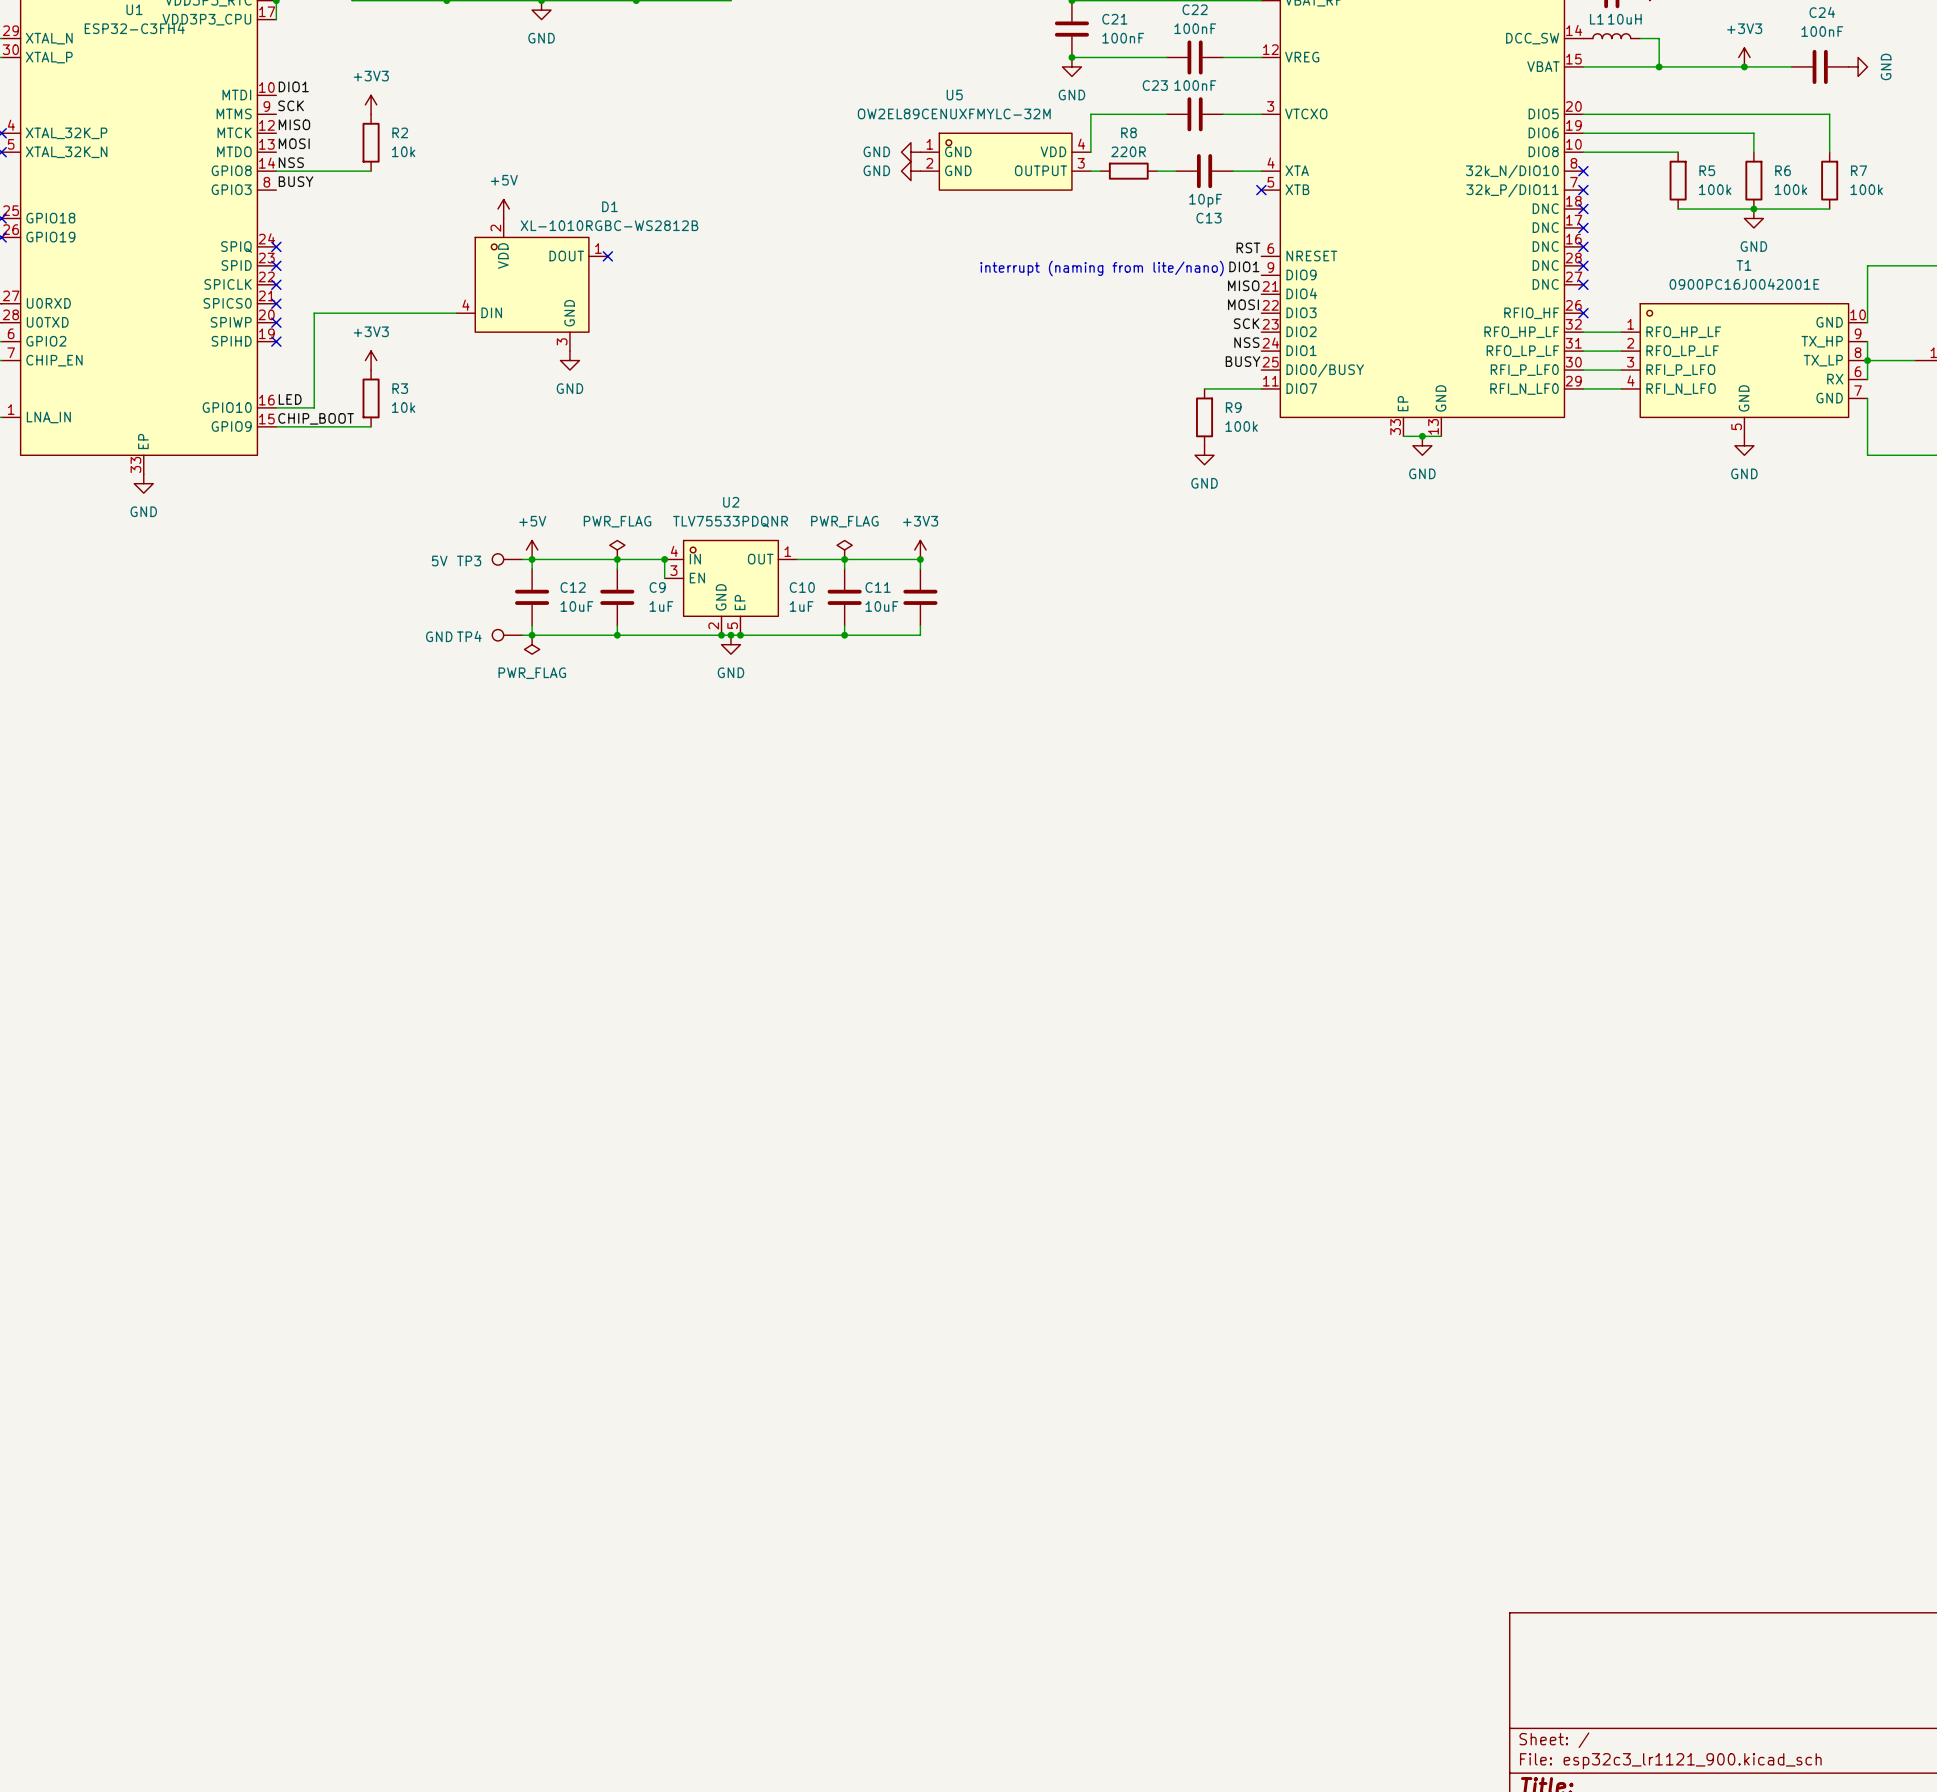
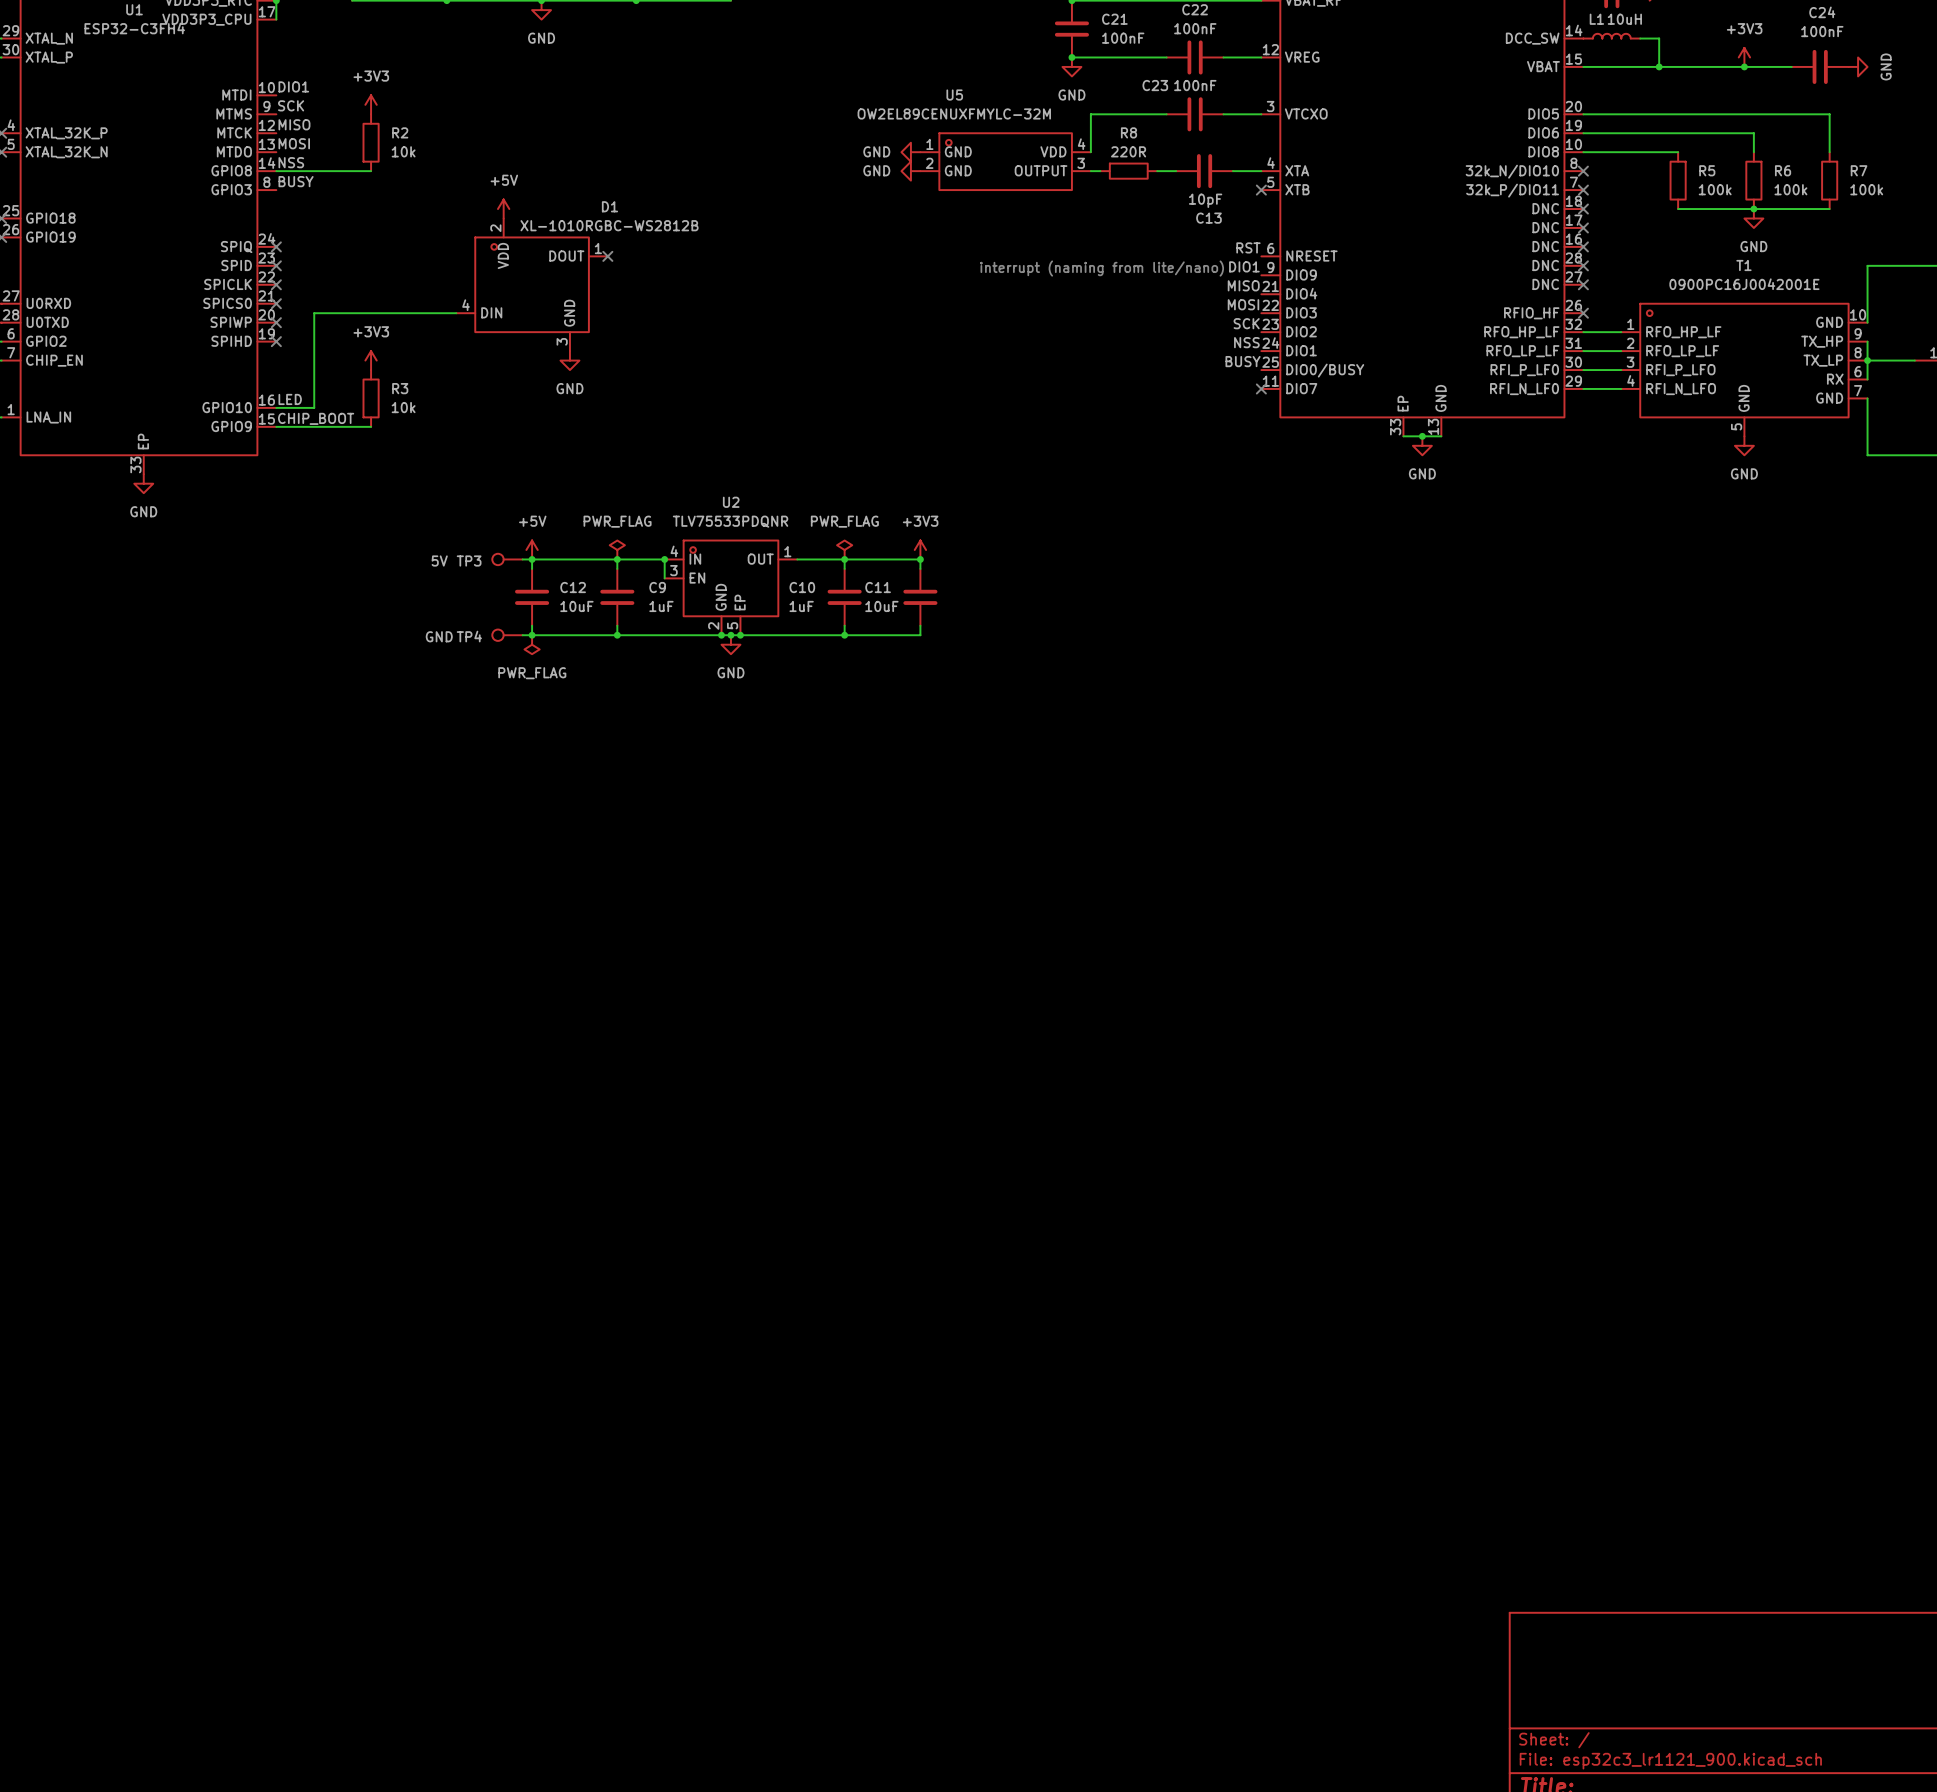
wire: (1204, 388) (1261, 388) -> none
no-connect mark: none -> (1261, 388)
R9: 100k (1204, 417) -> none
power symbol: GND (1204, 455) -> none

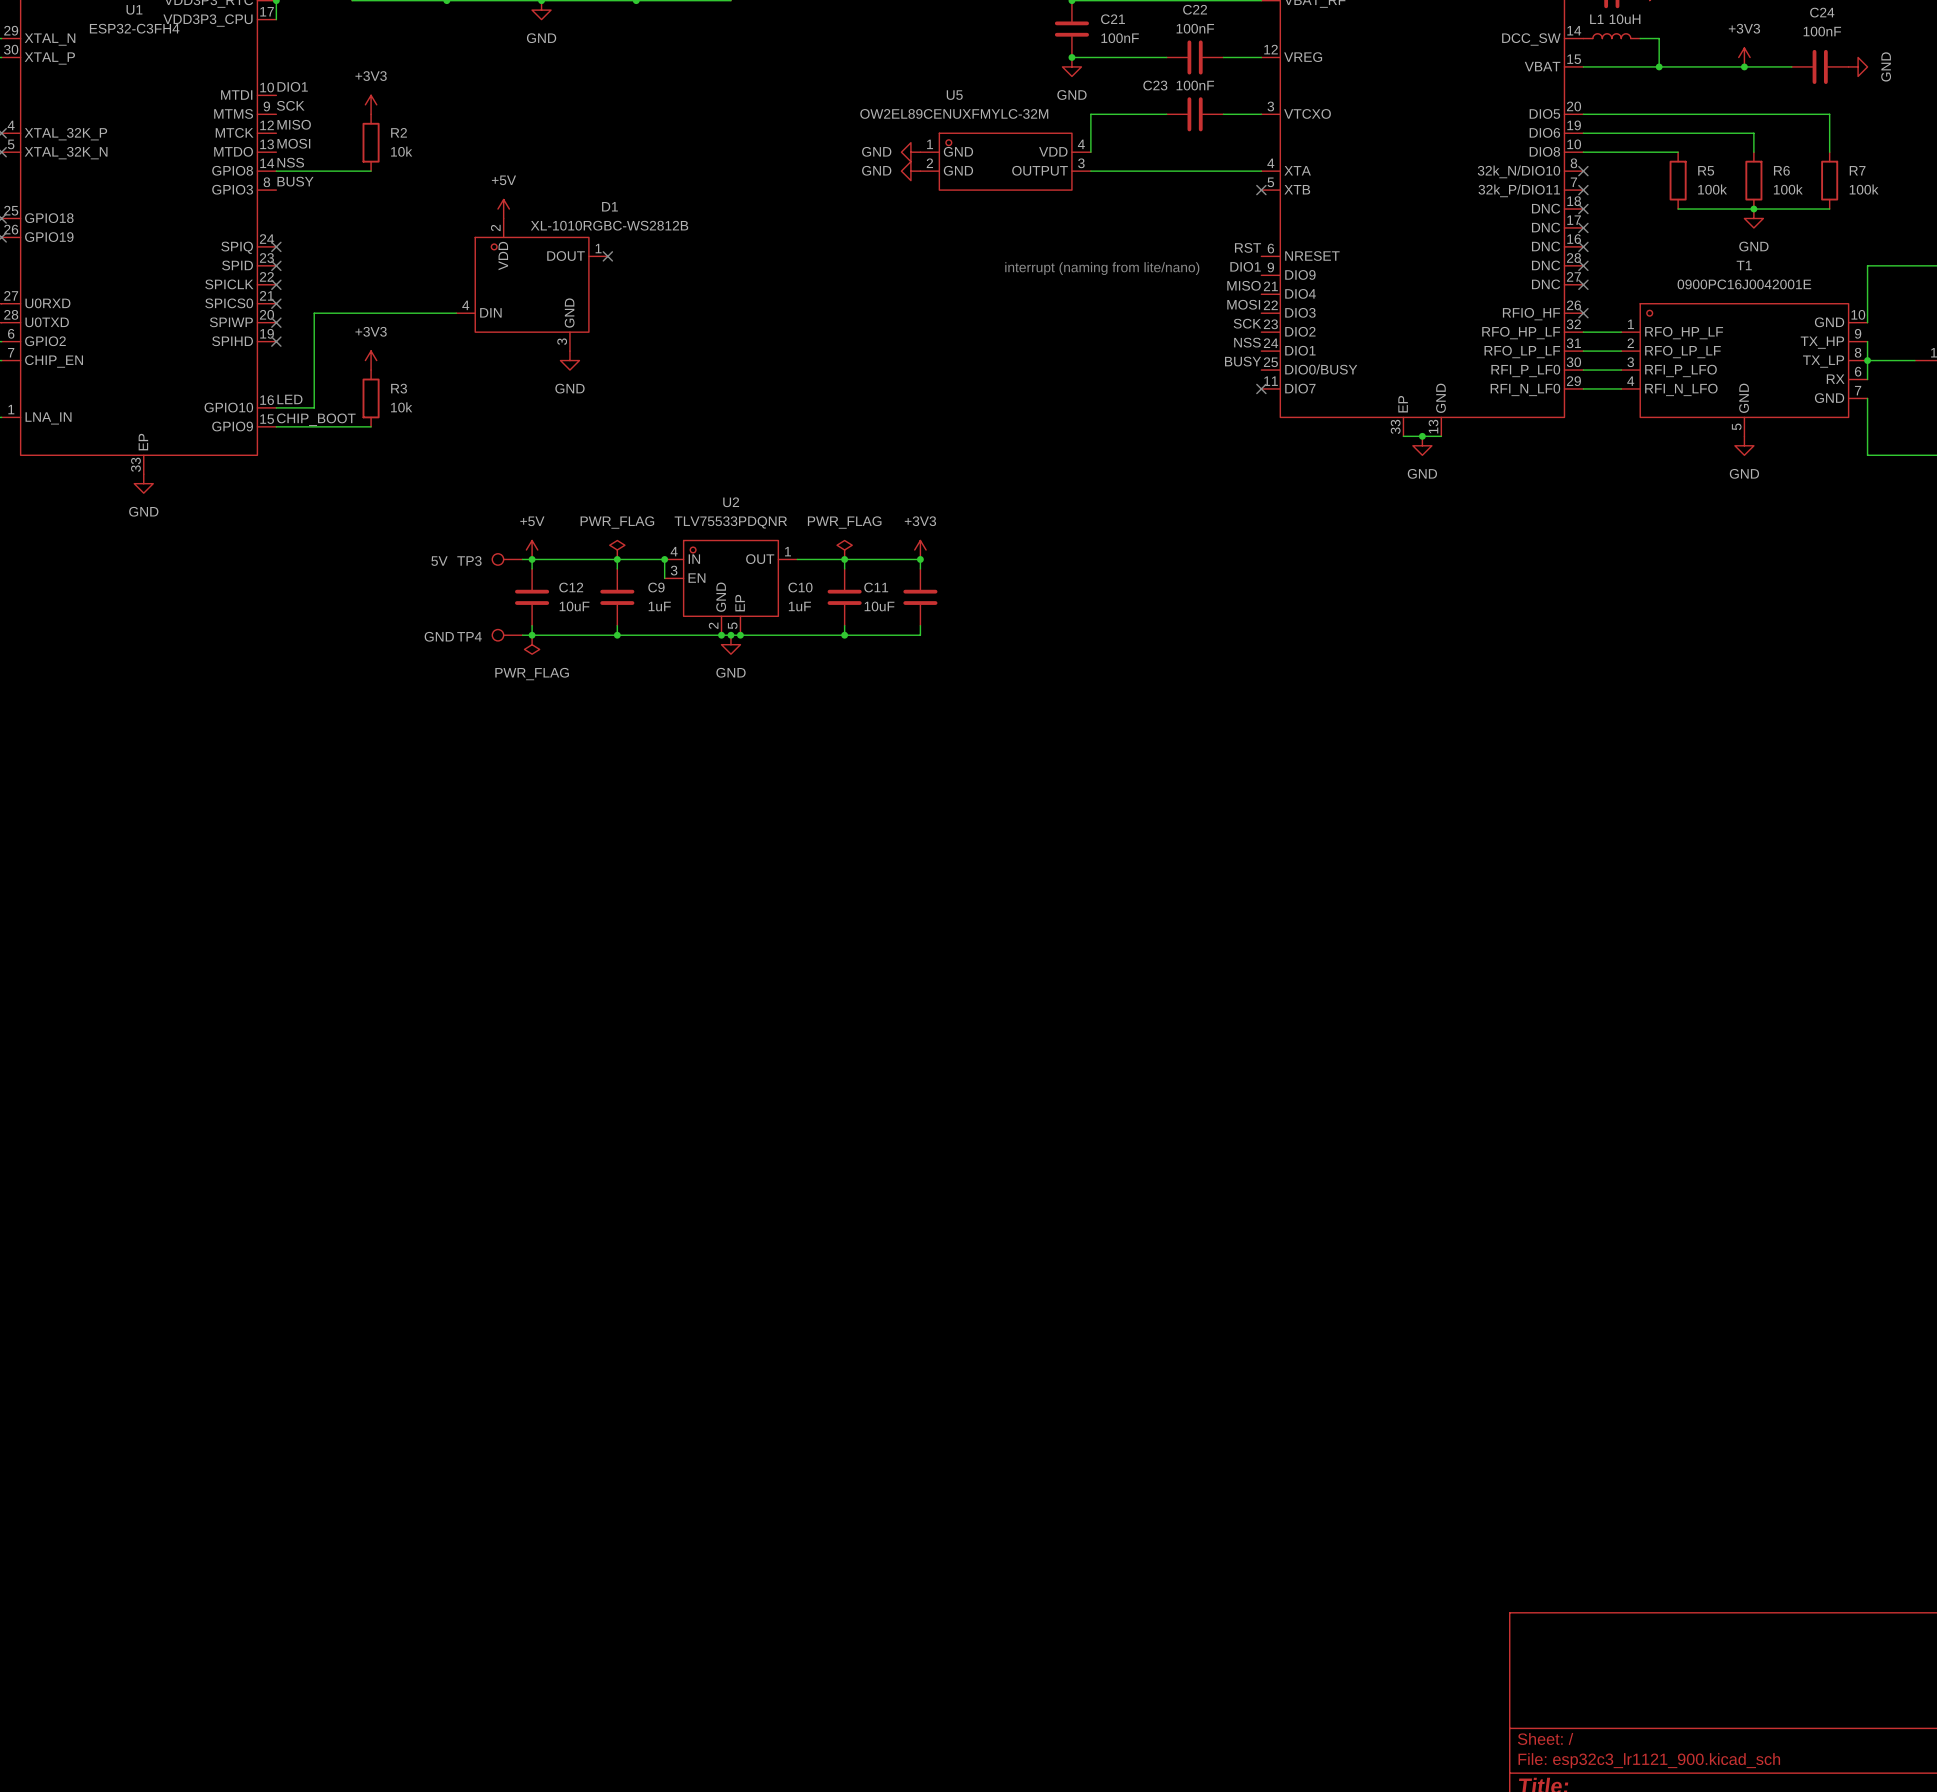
wire: none -> (1100, 171) (1157, 171)
R8: 220R (1128, 171) -> none
C13: 10pF (1204, 171) -> none

